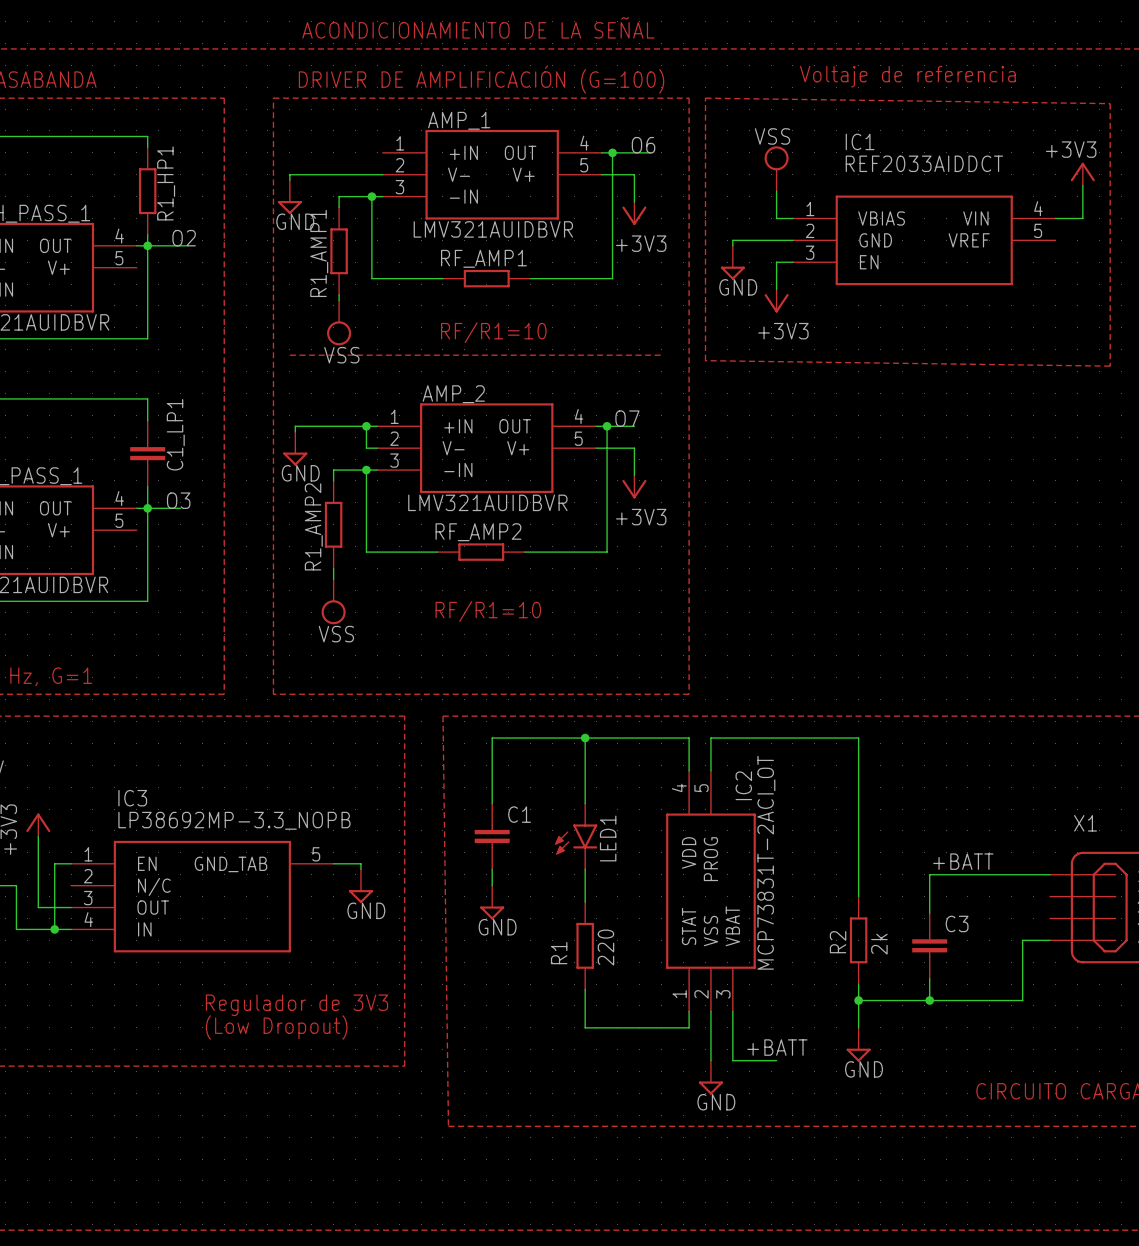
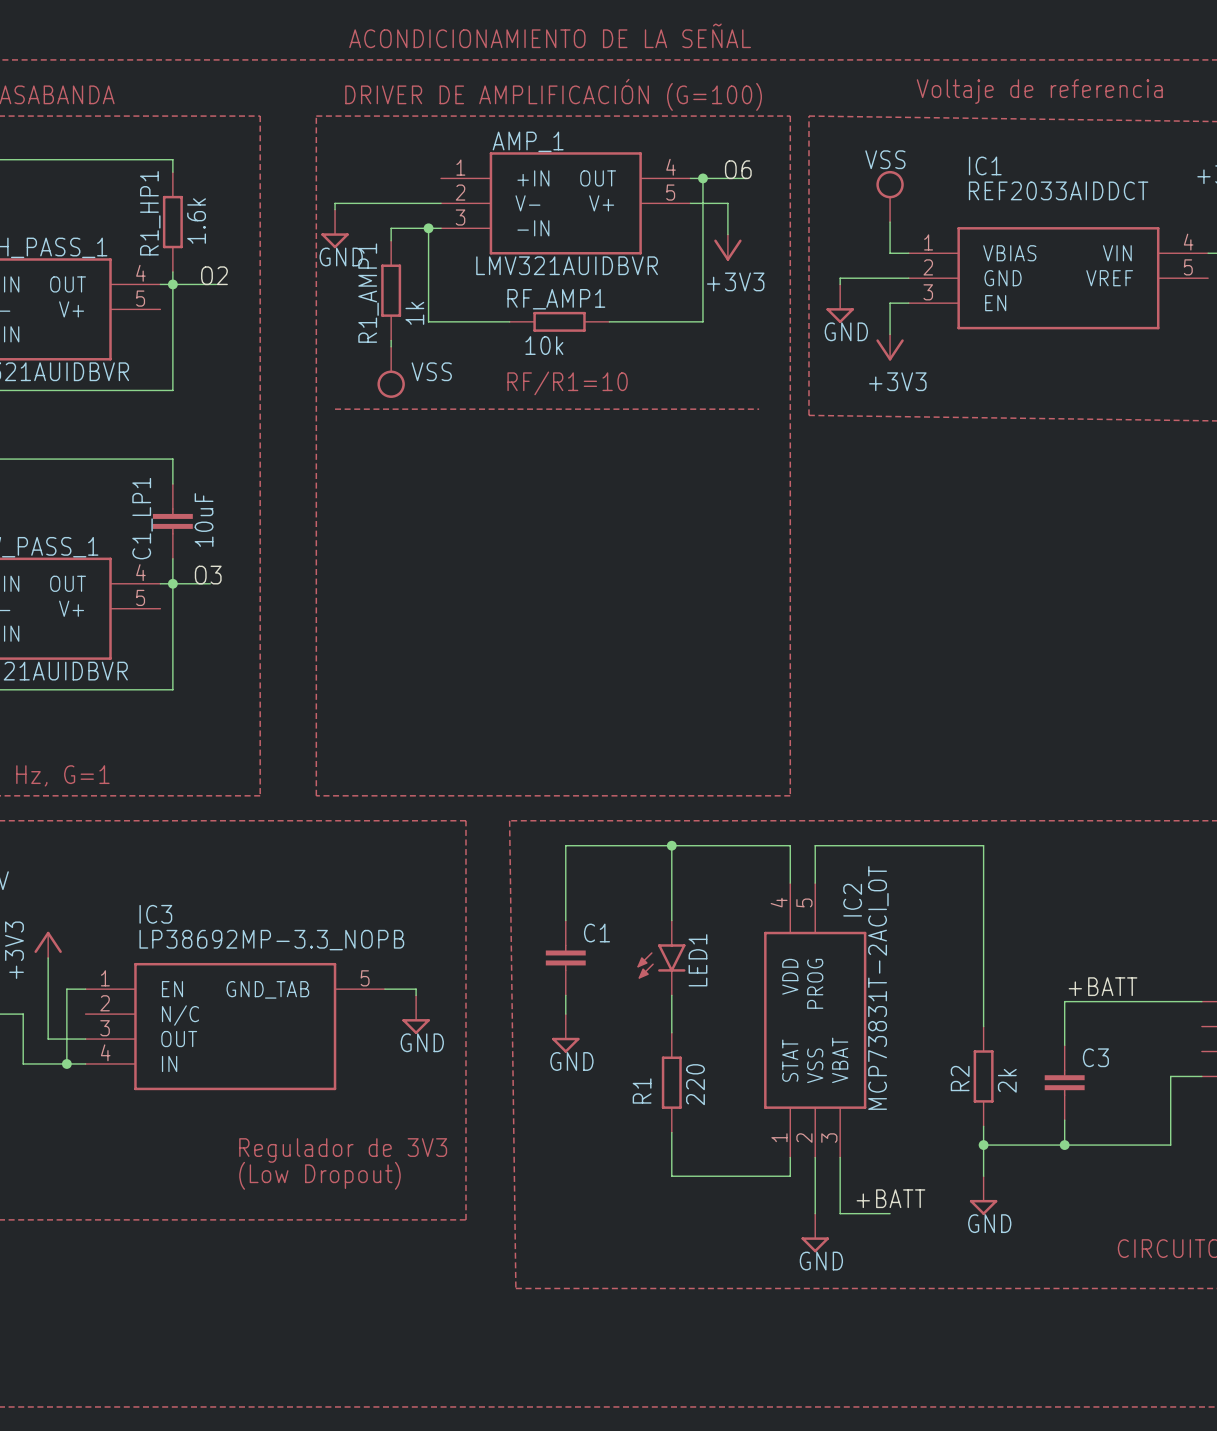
R1_HP1 name position: R1_HP1 (166, 183) -> R1_HP1 (150, 213)
R1_HP1 value: none -> 1.6k (196, 221)
R1_AMP1 value: none -> 1k (414, 313)
RF_AMP1 value: none -> 10k (544, 345)
power symbol text position: VSS (341, 355) -> VSS (431, 371)
label: O7 (627, 418) -> none
wire: (366, 426) (366, 448) (377, 448) -> none
junction: (366, 426) -> none
wire: (377, 426) (295, 426) (295, 431) -> none
wire: (596, 426) (634, 426) -> none
wire: (607, 426) (607, 552) (525, 552) -> none
junction: (607, 426) -> none
C1_LP1 name position: C1_LP1 (175, 434) -> C1_LP1 (142, 518)
power symbol: GND (295, 448) -> none
AMP_2: LMV321AUIDBVR (486, 448) -> none
wire: (596, 448) (634, 448) (634, 475) -> none
C1_LP1 value: none -> 10uF (204, 520)
wire: (366, 470) (366, 552) (437, 552) -> none
junction: (366, 470) -> none
wire: (377, 470) (333, 470) (333, 480) -> none
power symbol: +3V3 (634, 487) -> none
R1_AMP2: (333, 524) -> none
RF_AMP2: (481, 552) -> none
wire: (333, 568) (333, 579) -> none
power symbol: VSS (333, 601) -> none
text: RF/R1=10 (488, 611) -> none

